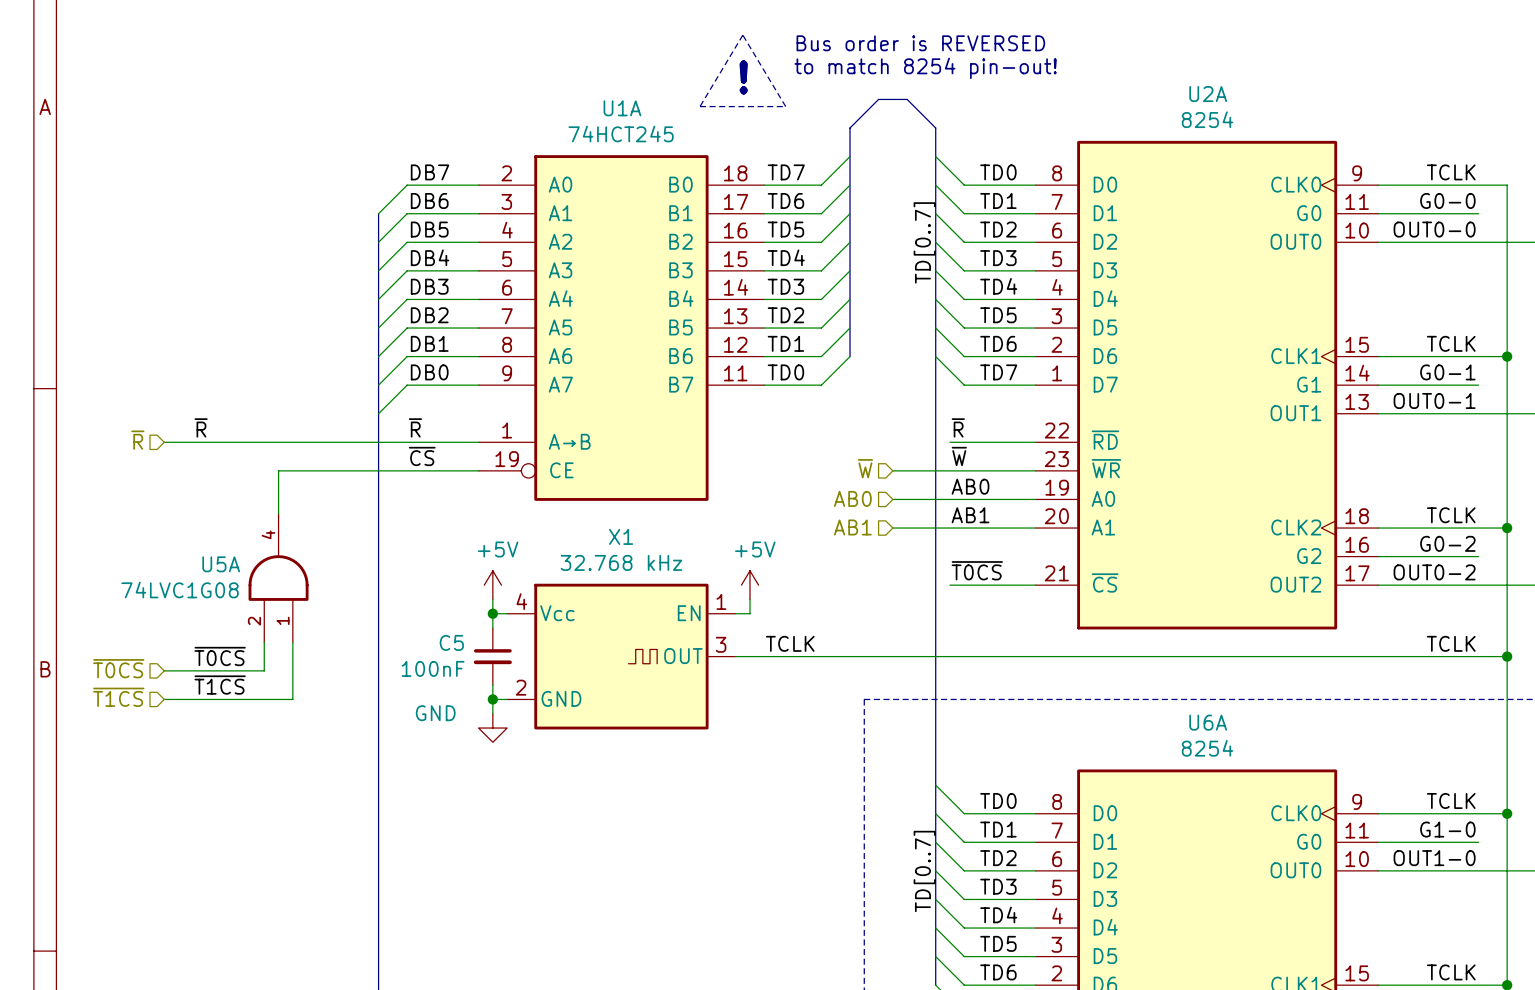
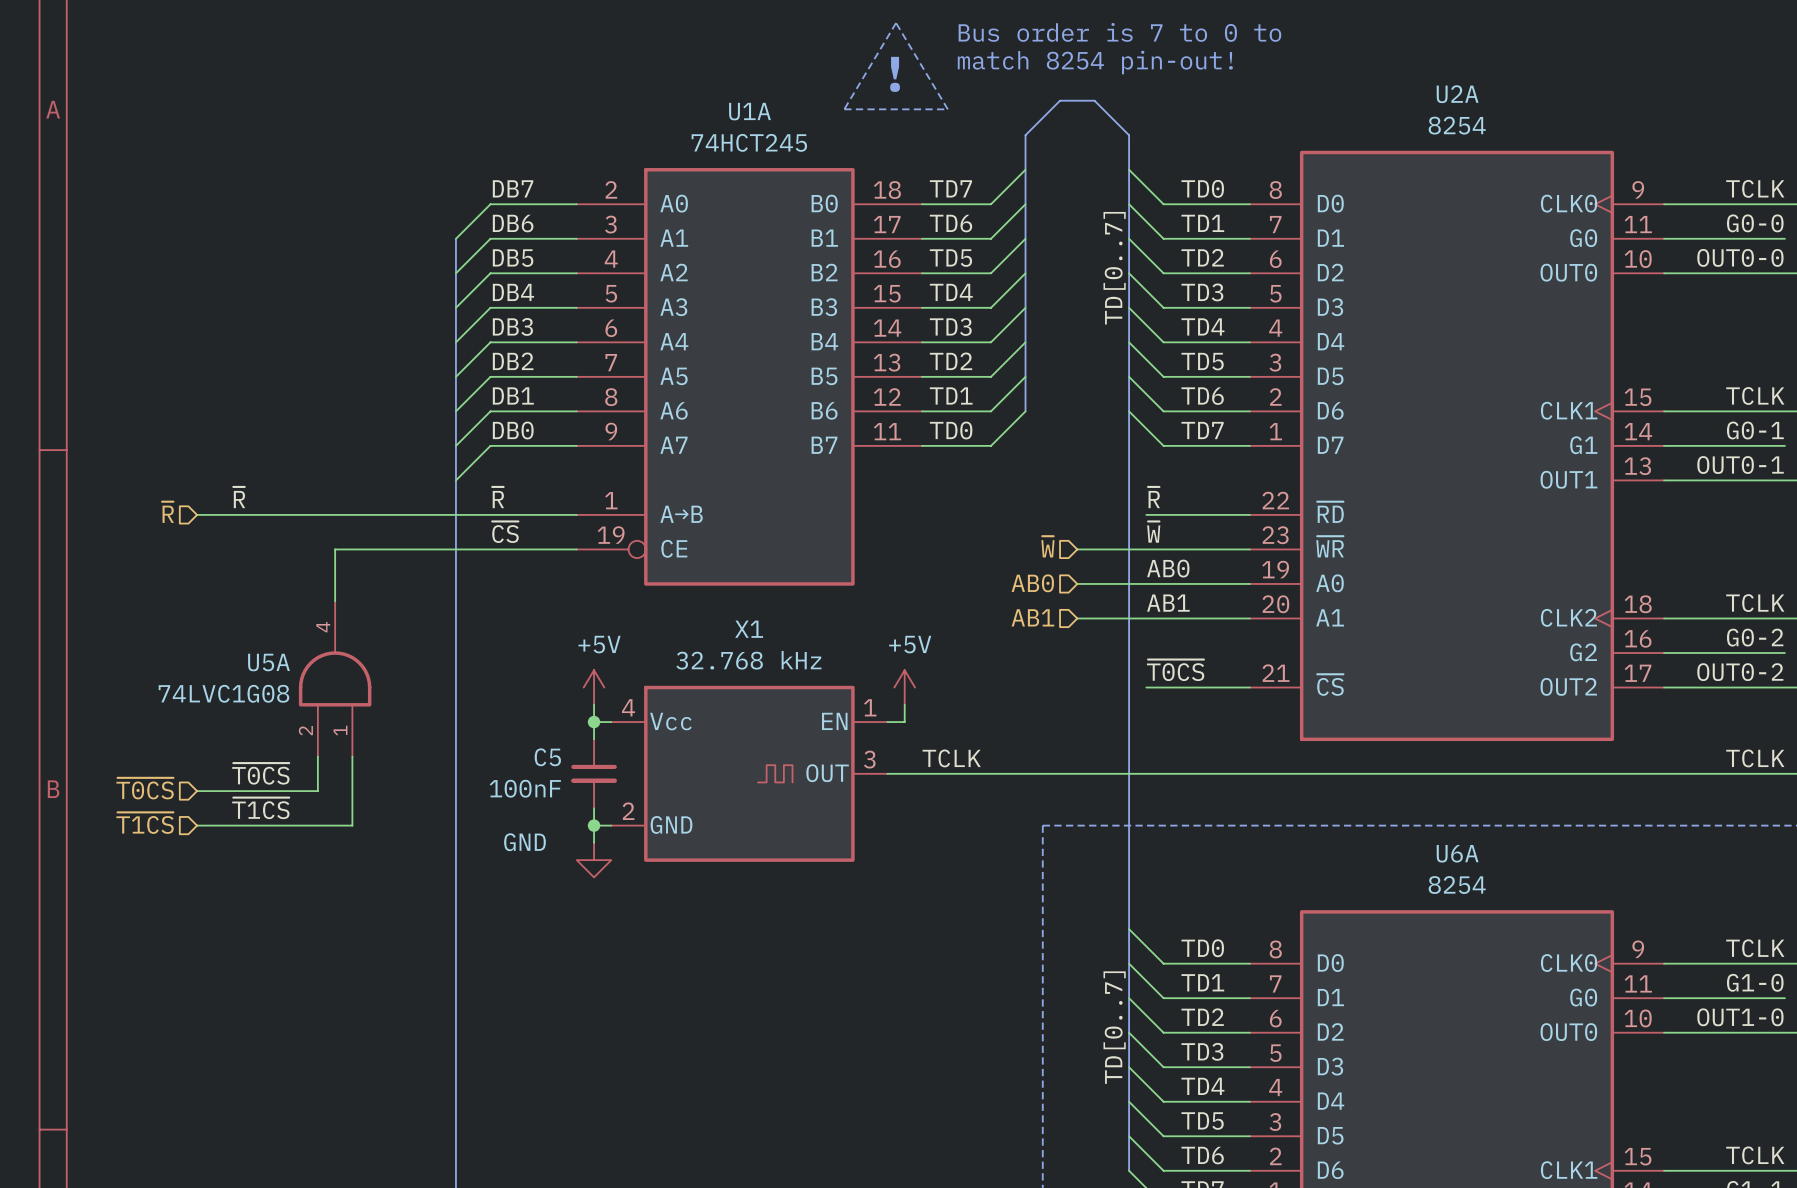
text: Bus order is REVERSED (920, 43) -> Bus order is 7 to 0 to (1119, 32)
text: to match 8254 pin-out! (925, 68) -> match 8254 pin-out! (1095, 62)

